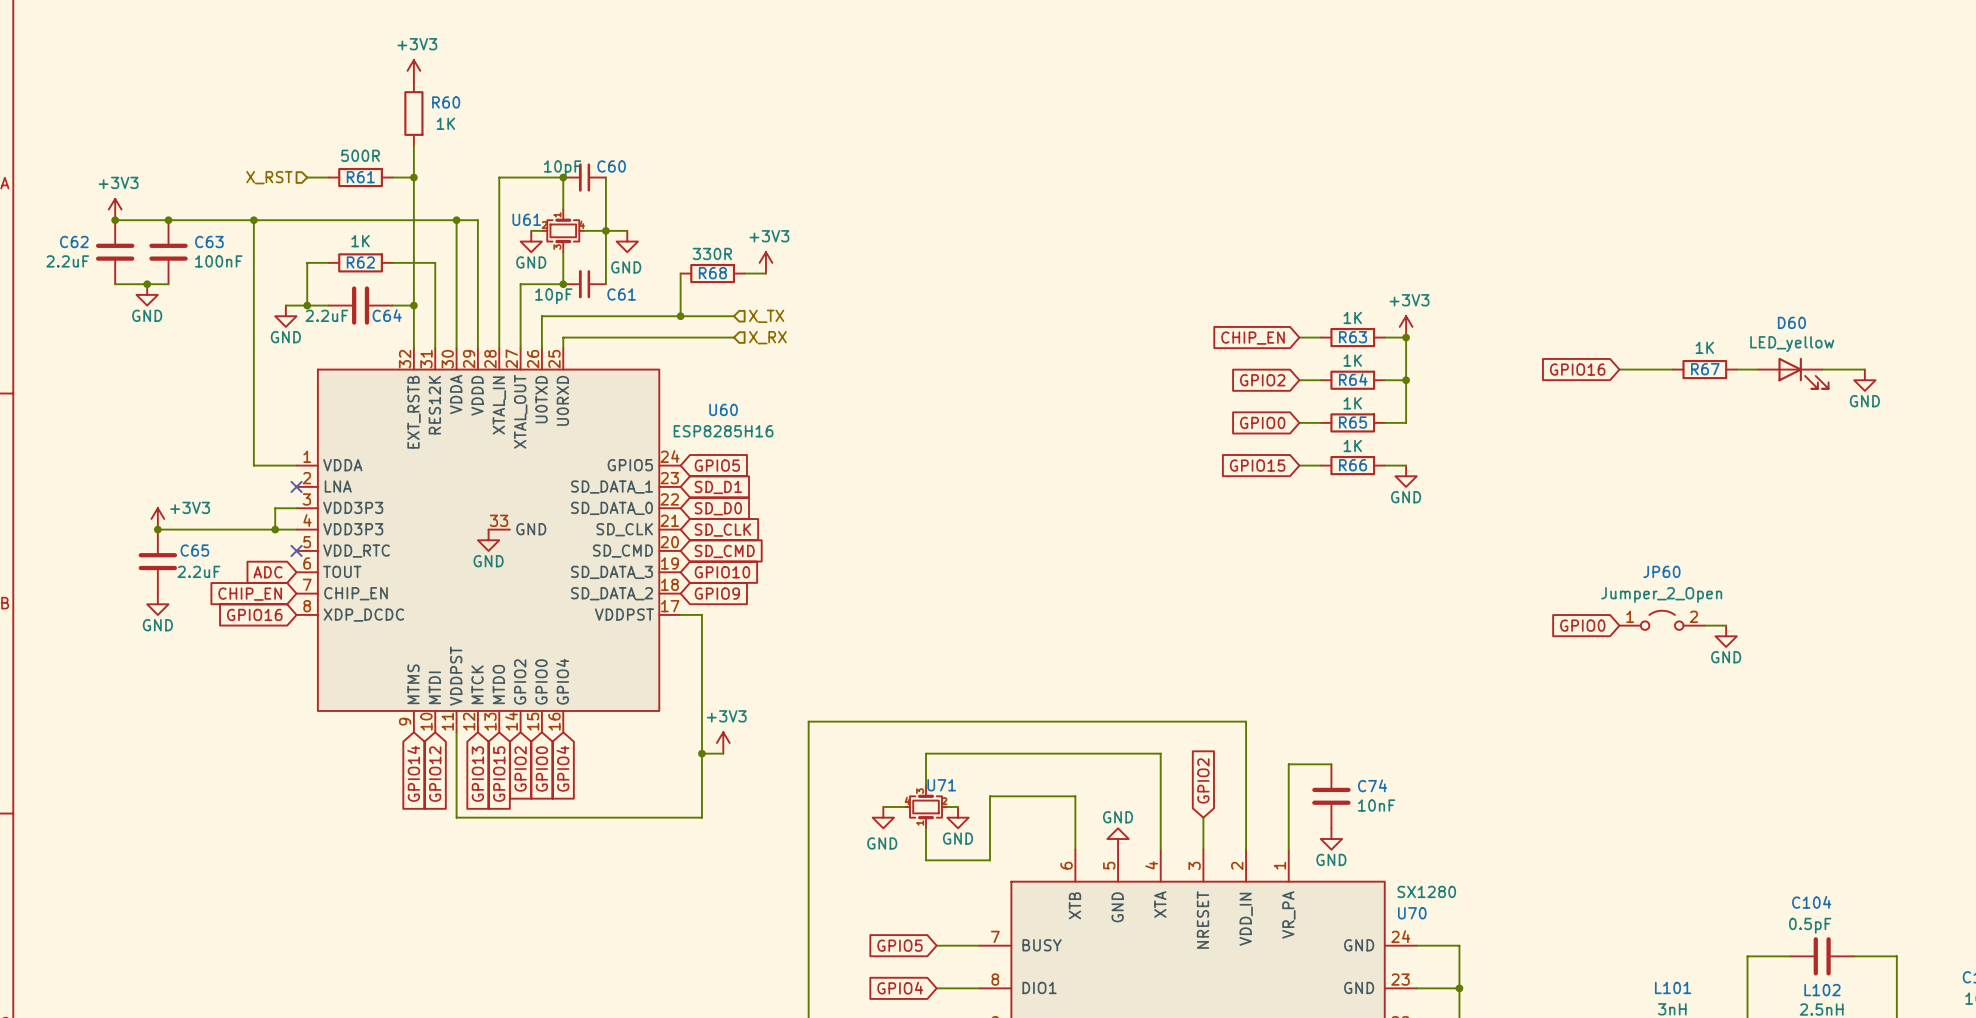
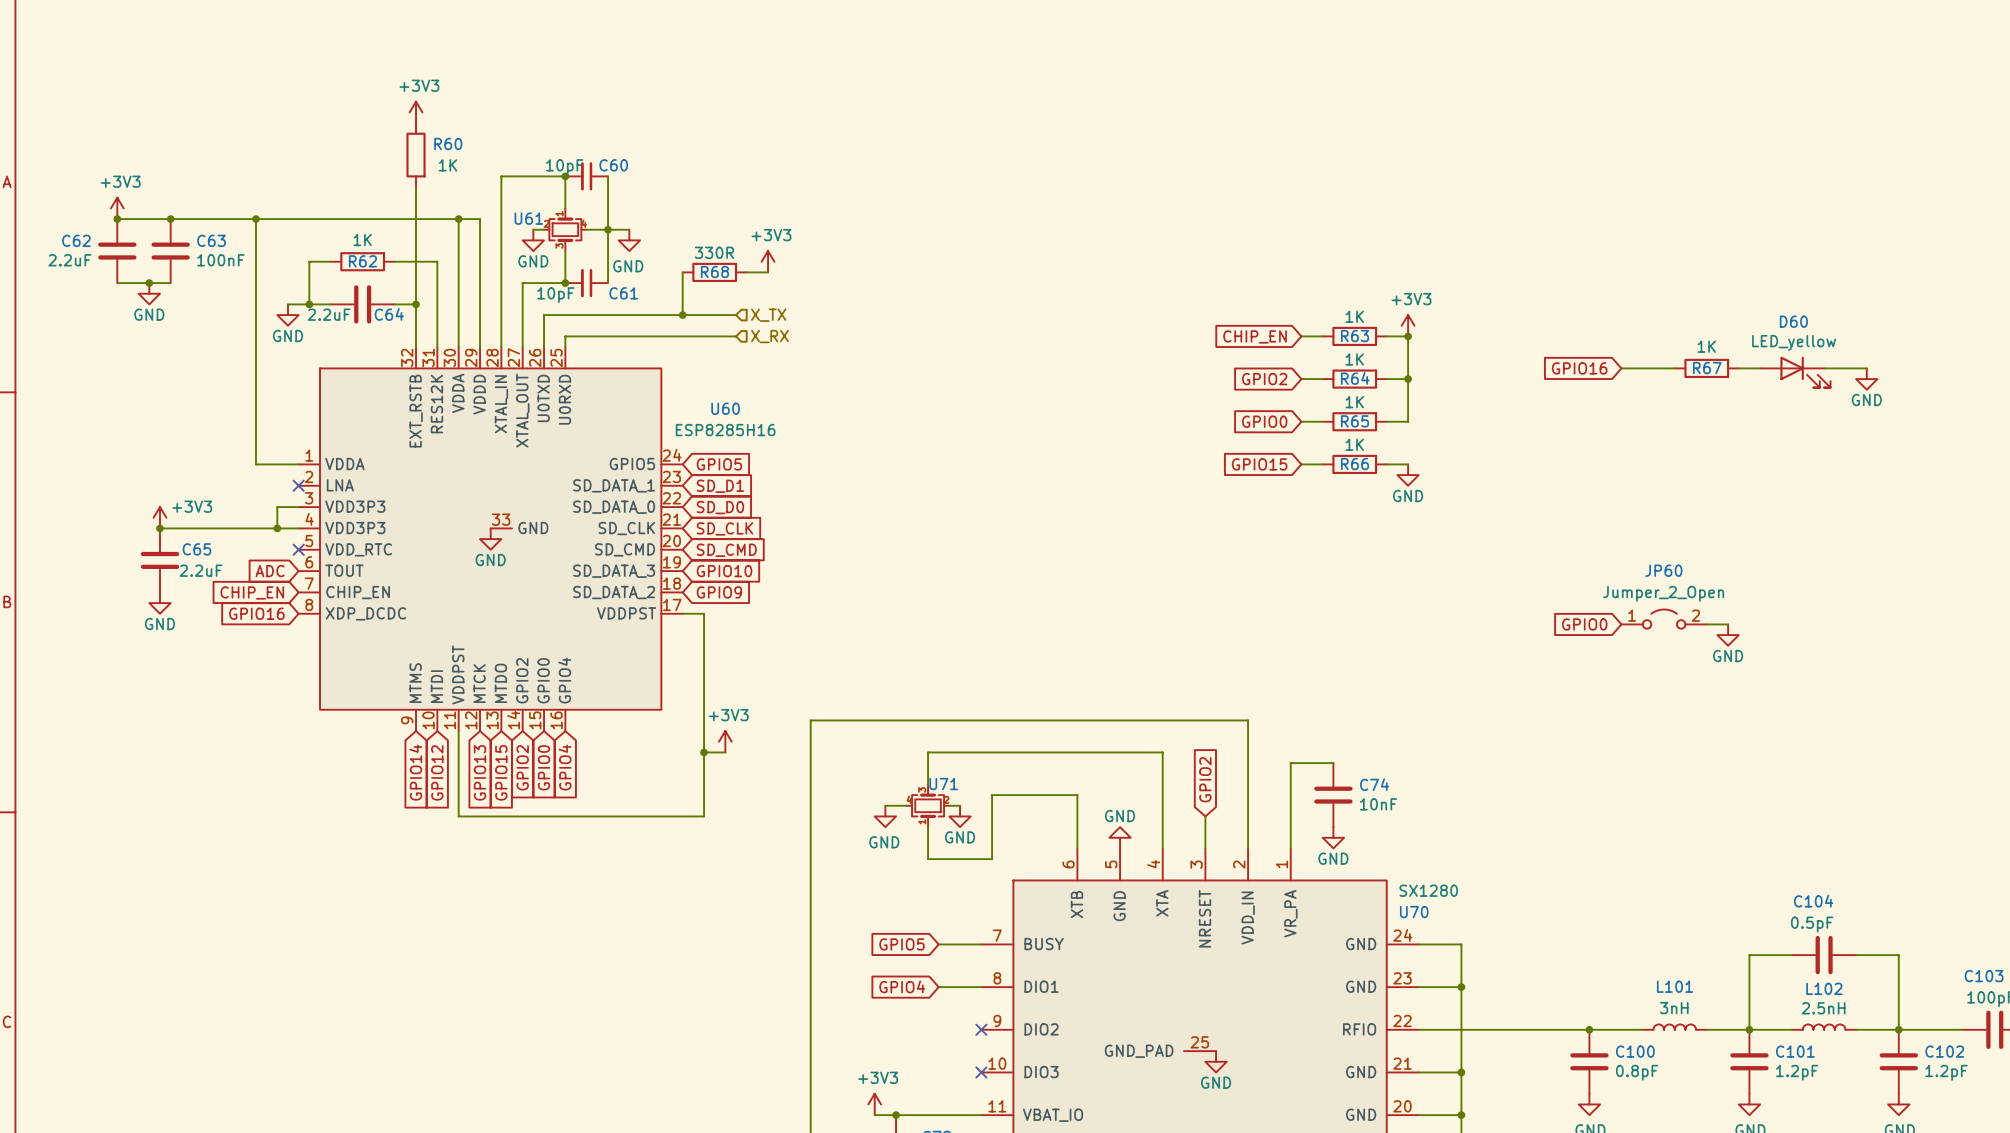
power symbol position: +3V3 (413, 70) -> +3V3 (416, 112)
R60 position: (413, 113) -> (416, 155)
wire: (413, 145) (413, 188) -> none
hierarchical label: X_RST (269, 177) -> none
wire: (307, 177) (328, 177) -> none
R61: 500R (360, 177) -> none
wire: (392, 177) (413, 177) -> none
junction: (413, 177) -> none

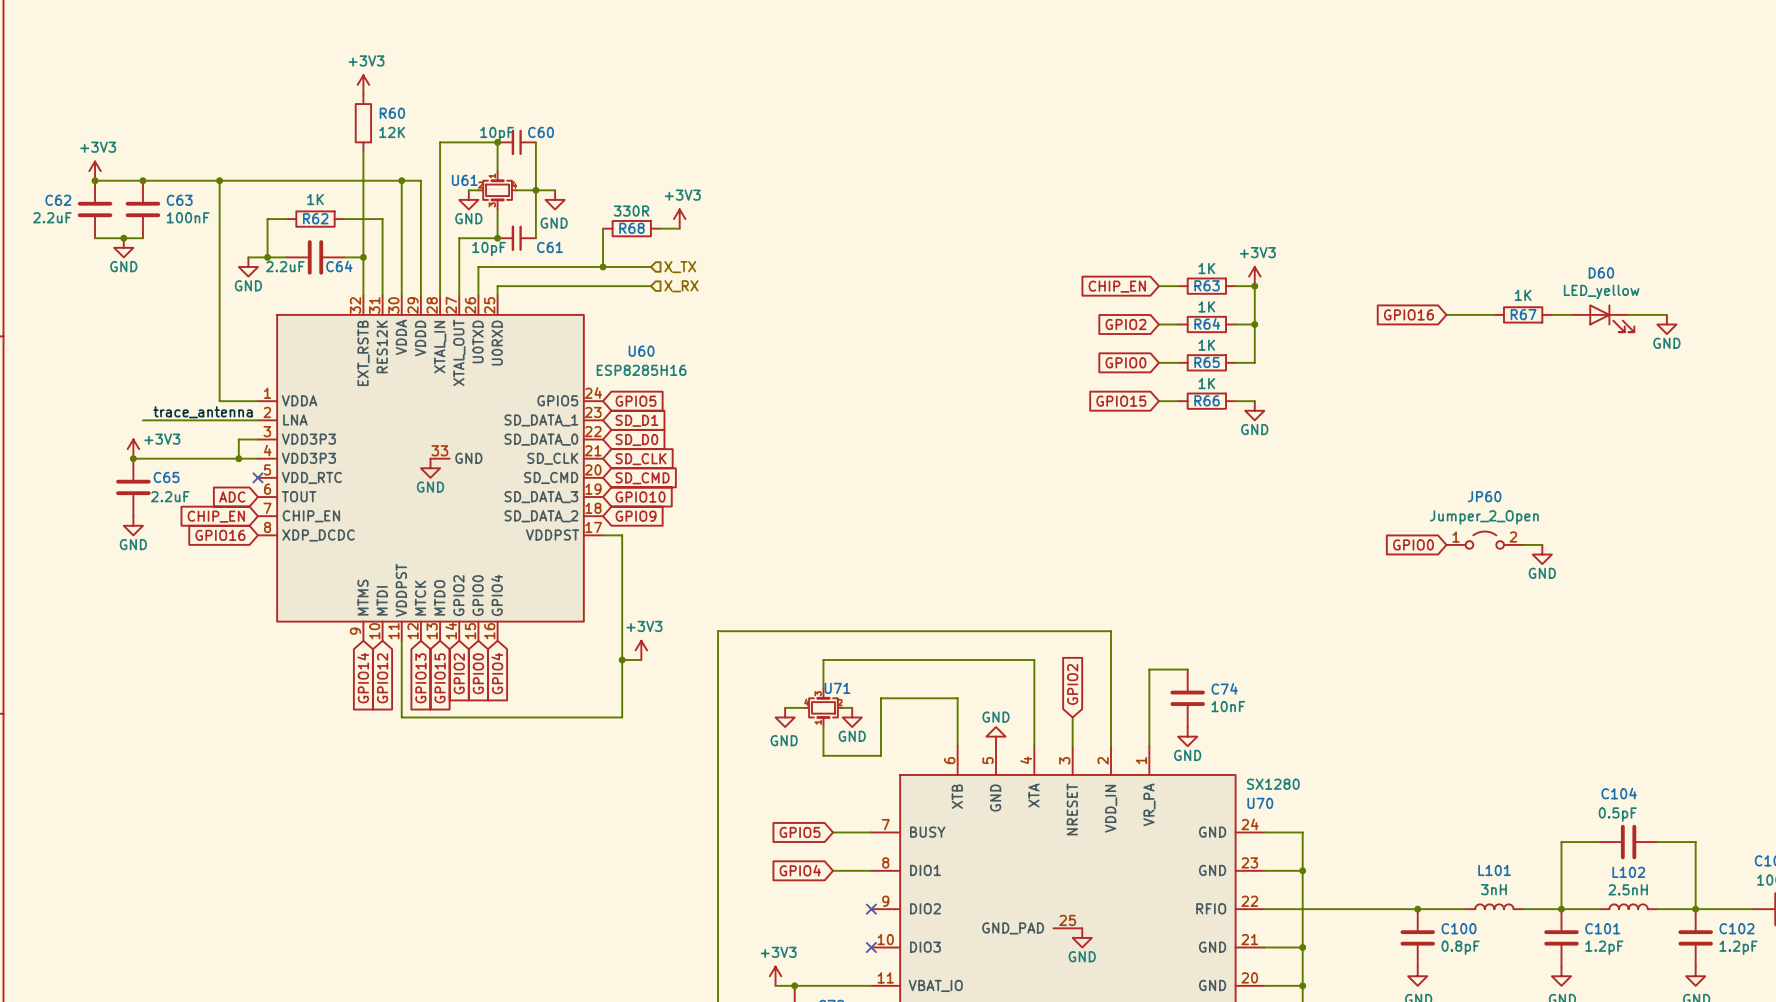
R60 value: 1K (448, 165) -> 12K (392, 132)
label: none -> trace_antenna (203, 412)
wire: none -> (142, 420) (257, 420)
no-connect mark: (298, 485) -> none

